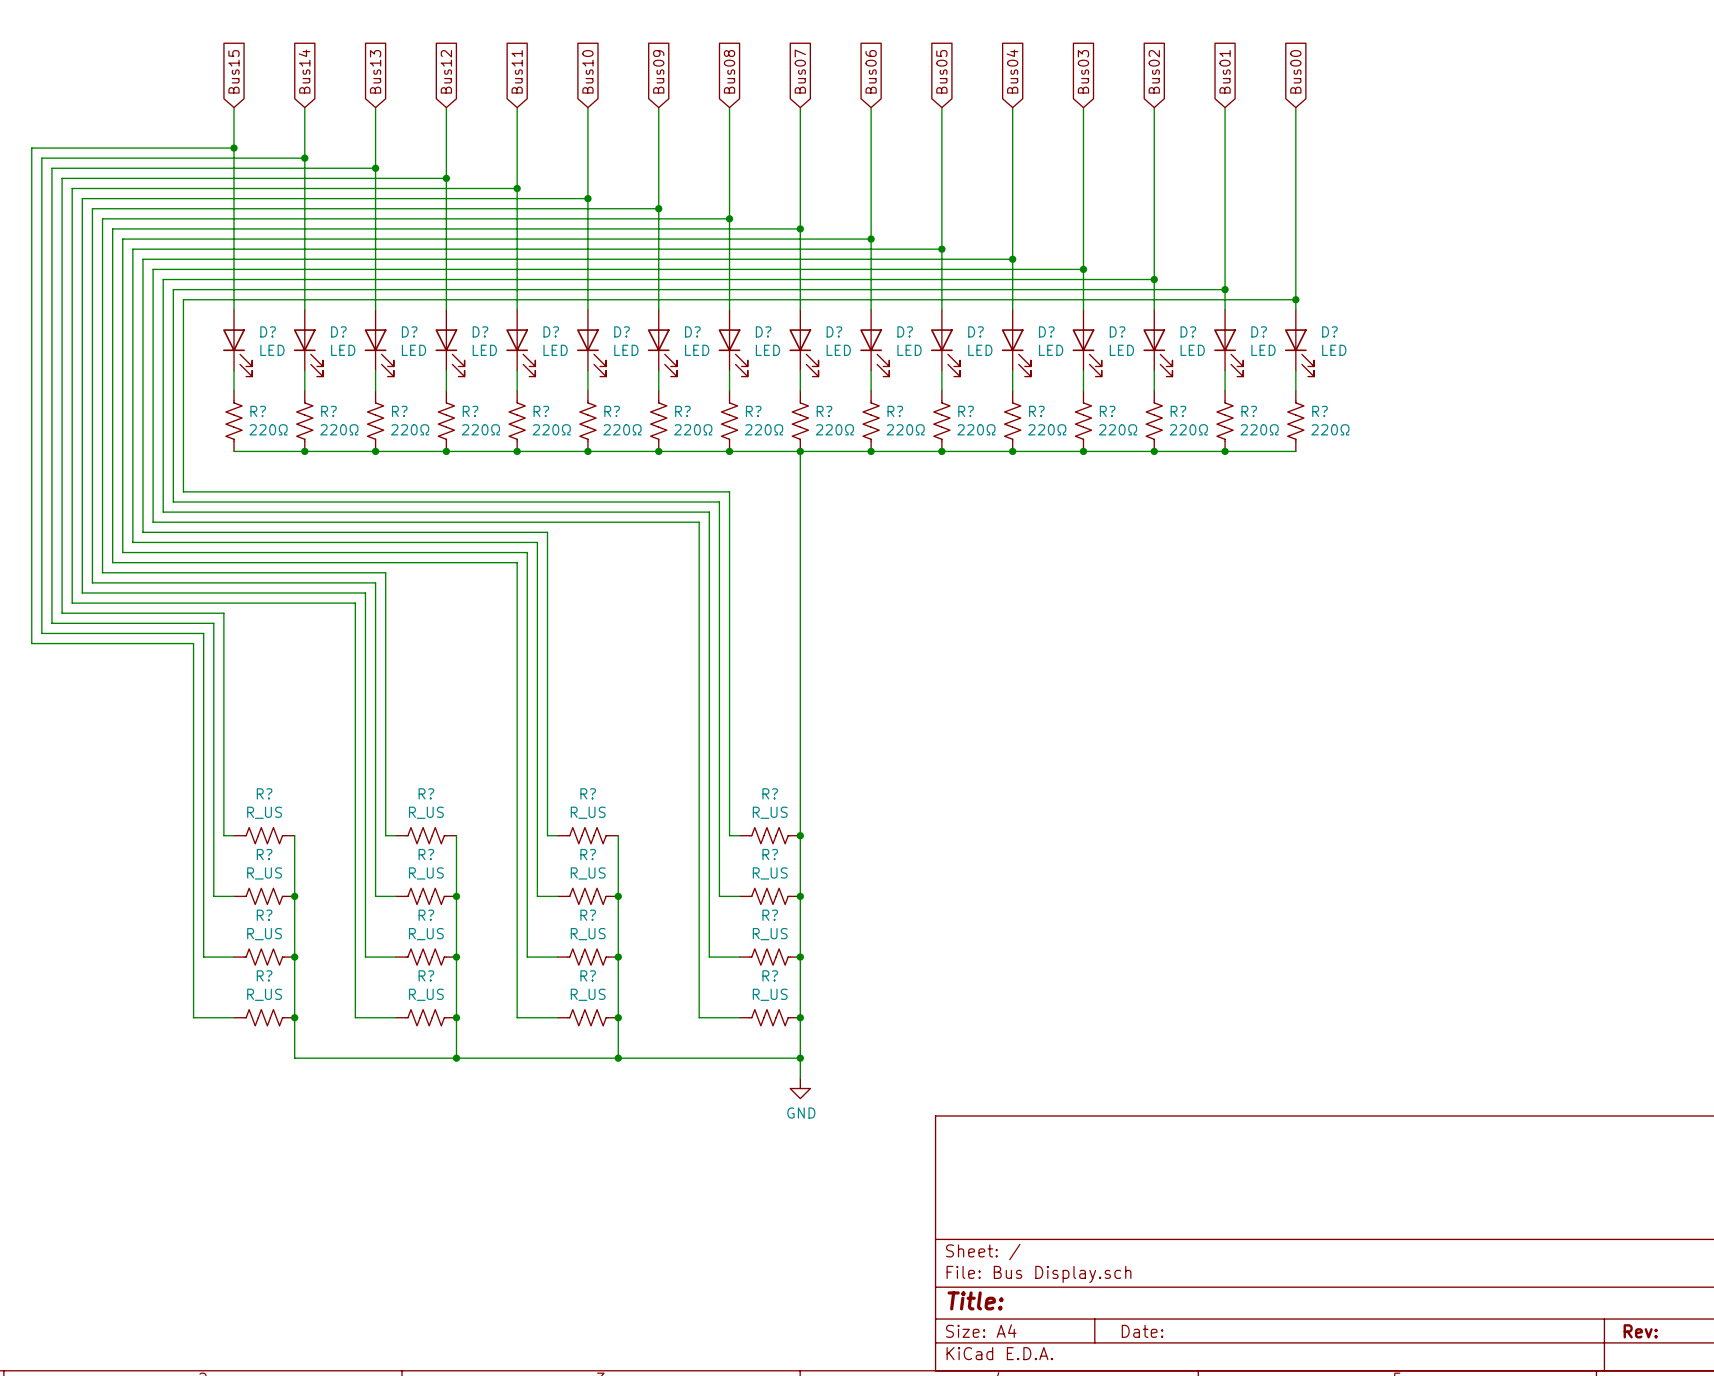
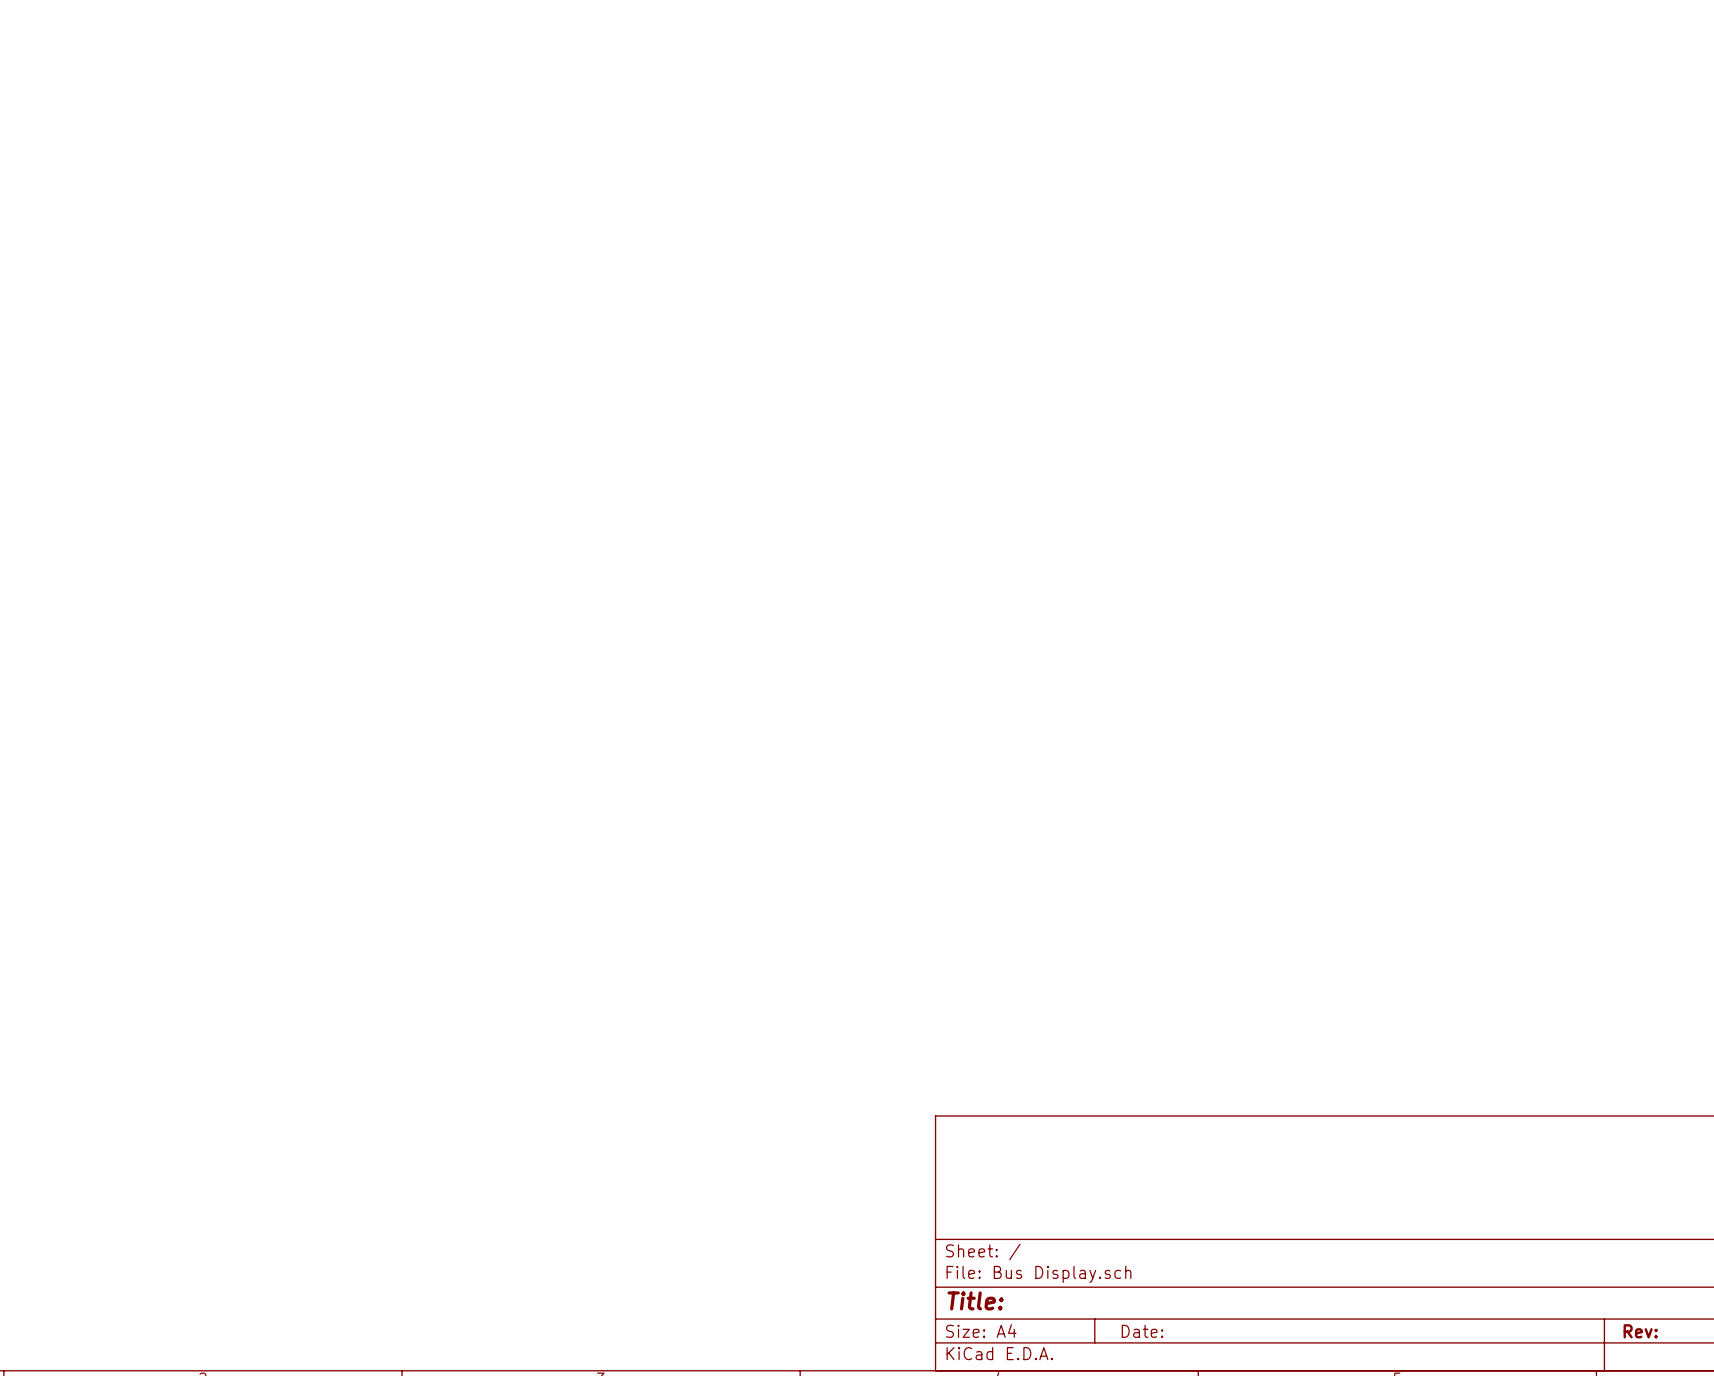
global label: Bus15 (234, 71) -> none
global label: Bus14 (304, 71) -> none
global label: Bus13 (375, 71) -> none
global label: Bus12 (446, 71) -> none
global label: Bus11 (517, 71) -> none
global label: Bus10 (587, 71) -> none
global label: Bus09 (658, 71) -> none
global label: Bus08 (729, 71) -> none
global label: Bus07 (800, 71) -> none
global label: Bus06 (871, 71) -> none
global label: Bus05 (941, 71) -> none
global label: Bus04 (1012, 71) -> none
global label: Bus03 (1083, 71) -> none
global label: Bus02 (1154, 71) -> none
global label: Bus01 (1225, 71) -> none
global label: Bus00 (1295, 71) -> none
wire: (234, 107) (234, 309) -> none
wire: (304, 107) (304, 309) -> none
wire: (375, 107) (375, 309) -> none
wire: (446, 107) (446, 309) -> none
wire: (517, 107) (517, 309) -> none
wire: (587, 107) (587, 309) -> none
wire: (658, 107) (658, 309) -> none
wire: (729, 107) (729, 309) -> none
wire: (800, 107) (800, 309) -> none
wire: (871, 107) (871, 309) -> none
wire: (941, 107) (941, 309) -> none
wire: (1012, 107) (1012, 309) -> none
wire: (1083, 107) (1083, 309) -> none
wire: (1154, 107) (1154, 309) -> none
wire: (1225, 107) (1225, 309) -> none
wire: (1295, 107) (1295, 309) -> none
wire: (234, 148) (31, 148) (31, 643) (193, 643) (193, 1017) (234, 1017) -> none
junction: (234, 148) -> none
wire: (304, 158) (41, 158) (41, 633) (203, 633) (203, 957) (234, 957) -> none
junction: (304, 158) -> none
wire: (375, 168) (51, 168) (51, 623) (213, 623) (213, 896) (234, 896) -> none
junction: (375, 168) -> none
wire: (446, 178) (62, 178) (62, 613) (223, 613) (223, 835) (234, 835) -> none
junction: (446, 178) -> none
wire: (517, 188) (72, 188) (72, 603) (355, 603) (355, 1017) (395, 1017) -> none
junction: (517, 188) -> none
wire: (587, 198) (82, 198) (82, 593) (365, 593) (365, 957) (395, 957) -> none
junction: (587, 198) -> none
wire: (658, 208) (92, 208) (92, 582) (375, 582) (375, 896) (395, 896) -> none
junction: (658, 208) -> none
wire: (729, 218) (102, 218) (102, 572) (385, 572) (385, 835) (395, 835) -> none
junction: (729, 218) -> none
wire: (800, 228) (112, 228) (112, 562) (517, 562) (517, 1017) (557, 1017) -> none
junction: (800, 228) -> none
wire: (871, 239) (122, 239) (122, 552) (527, 552) (527, 957) (557, 957) -> none
junction: (871, 239) -> none
wire: (941, 249) (132, 249) (132, 542) (537, 542) (537, 896) (557, 896) -> none
junction: (941, 249) -> none
wire: (1012, 259) (142, 259) (142, 532) (547, 532) (547, 835) (557, 835) -> none
junction: (1012, 259) -> none
wire: (1083, 269) (153, 269) (153, 522) (699, 522) (699, 1017) (739, 1017) -> none
junction: (1083, 269) -> none
wire: (1154, 279) (163, 279) (163, 512) (709, 512) (709, 957) (739, 957) -> none
junction: (1154, 279) -> none
wire: (1225, 289) (173, 289) (173, 501) (719, 501) (719, 896) (739, 896) -> none
junction: (1225, 289) -> none
wire: (1295, 299) (183, 299) (183, 491) (729, 491) (729, 835) (739, 835) -> none
junction: (1295, 299) -> none
D?: LED (237, 343) -> none
D?: LED (308, 343) -> none
D?: LED (379, 343) -> none
D?: LED (450, 343) -> none
D?: LED (520, 343) -> none
D?: LED (591, 343) -> none
D?: LED (662, 343) -> none
D?: LED (733, 343) -> none
D?: LED (803, 343) -> none
D?: LED (874, 343) -> none
D?: LED (945, 343) -> none
D?: LED (1016, 343) -> none
D?: LED (1087, 343) -> none
D?: LED (1157, 343) -> none
D?: LED (1228, 343) -> none
D?: LED (1299, 343) -> none
wire: (234, 370) (234, 390) -> none
wire: (304, 370) (304, 390) -> none
wire: (375, 370) (375, 390) -> none
wire: (446, 370) (446, 390) -> none
wire: (517, 370) (517, 390) -> none
wire: (587, 370) (587, 390) -> none
wire: (658, 370) (658, 390) -> none
wire: (729, 370) (729, 390) -> none
wire: (800, 370) (800, 390) -> none
wire: (871, 370) (871, 390) -> none
wire: (941, 370) (941, 390) -> none
wire: (1012, 370) (1012, 390) -> none
wire: (1083, 370) (1083, 390) -> none
wire: (1154, 370) (1154, 390) -> none
wire: (1225, 370) (1225, 390) -> none
wire: (1295, 370) (1295, 390) -> none
R?: 220Ω (234, 421) -> none
R?: 220Ω (304, 421) -> none
R?: 220Ω (375, 421) -> none
R?: 220Ω (446, 421) -> none
R?: 220Ω (517, 421) -> none
R?: 220Ω (587, 421) -> none
R?: 220Ω (658, 421) -> none
R?: 220Ω (729, 421) -> none
R?: 220Ω (800, 421) -> none
R?: 220Ω (871, 421) -> none
R?: 220Ω (941, 421) -> none
R?: 220Ω (1012, 421) -> none
R?: 220Ω (1083, 421) -> none
R?: 220Ω (1154, 421) -> none
R?: 220Ω (1225, 421) -> none
R?: 220Ω (1295, 421) -> none
wire: (234, 451) (1295, 451) -> none
junction: (304, 451) -> none
junction: (375, 451) -> none
junction: (446, 451) -> none
junction: (517, 451) -> none
junction: (587, 451) -> none
junction: (658, 451) -> none
junction: (729, 451) -> none
wire: (800, 451) (800, 1078) -> none
junction: (800, 451) -> none
junction: (871, 451) -> none
junction: (941, 451) -> none
junction: (1012, 451) -> none
junction: (1083, 451) -> none
junction: (1154, 451) -> none
junction: (1225, 451) -> none
R?: R_US (264, 835) -> none
wire: (294, 835) (294, 1058) (800, 1058) -> none
R?: R_US (426, 835) -> none
wire: (456, 835) (456, 1058) -> none
R?: R_US (587, 835) -> none
wire: (618, 835) (618, 1058) -> none
R?: R_US (769, 835) -> none
junction: (800, 835) -> none
R?: R_US (264, 896) -> none
junction: (294, 896) -> none
R?: R_US (426, 896) -> none
junction: (456, 896) -> none
R?: R_US (587, 896) -> none
junction: (618, 896) -> none
R?: R_US (769, 896) -> none
junction: (800, 896) -> none
R?: R_US (264, 957) -> none
junction: (294, 957) -> none
R?: R_US (426, 957) -> none
junction: (456, 957) -> none
R?: R_US (587, 957) -> none
junction: (618, 957) -> none
R?: R_US (769, 957) -> none
junction: (800, 957) -> none
R?: R_US (264, 1017) -> none
junction: (294, 1017) -> none
R?: R_US (426, 1017) -> none
junction: (456, 1017) -> none
R?: R_US (587, 1017) -> none
junction: (618, 1017) -> none
R?: R_US (769, 1017) -> none
junction: (800, 1017) -> none
junction: (456, 1058) -> none
junction: (618, 1058) -> none
junction: (800, 1058) -> none
power symbol: GND (800, 1088) -> none

